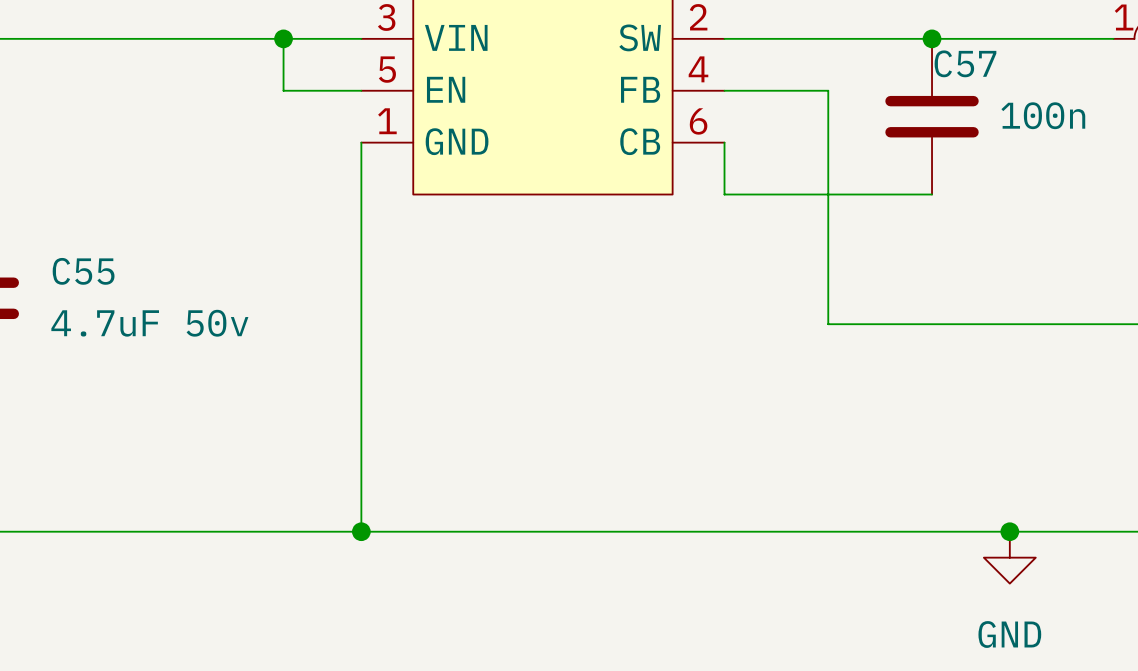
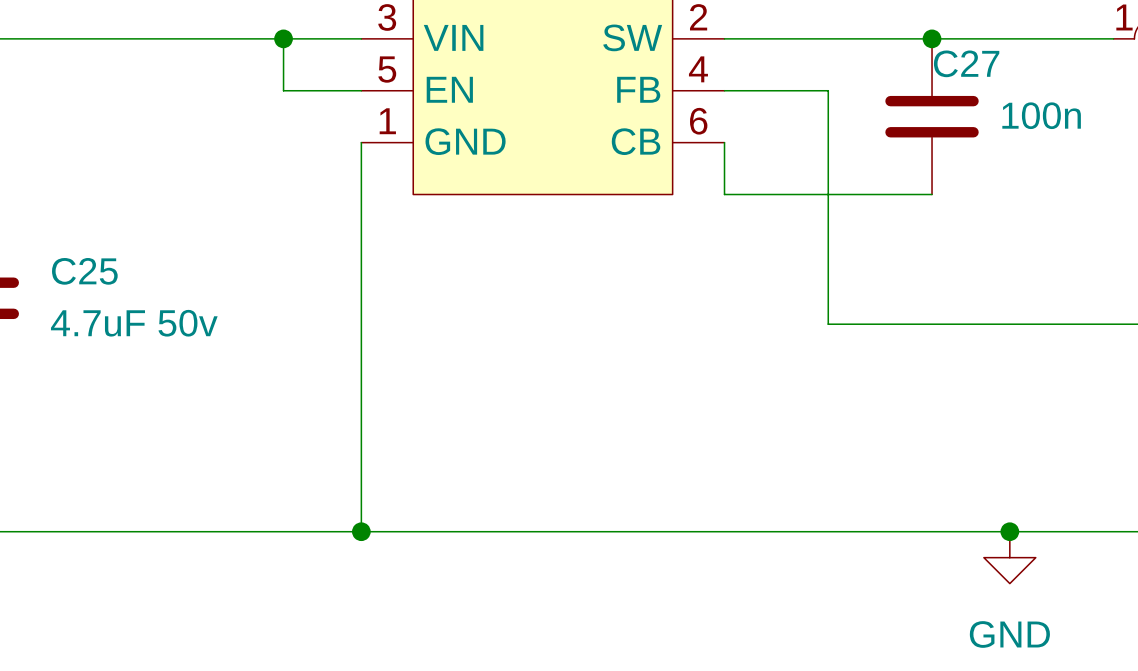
C57 name: C57 (965, 63) -> C27 (966, 63)
C55 name: C55 (83, 271) -> C25 (84, 271)

